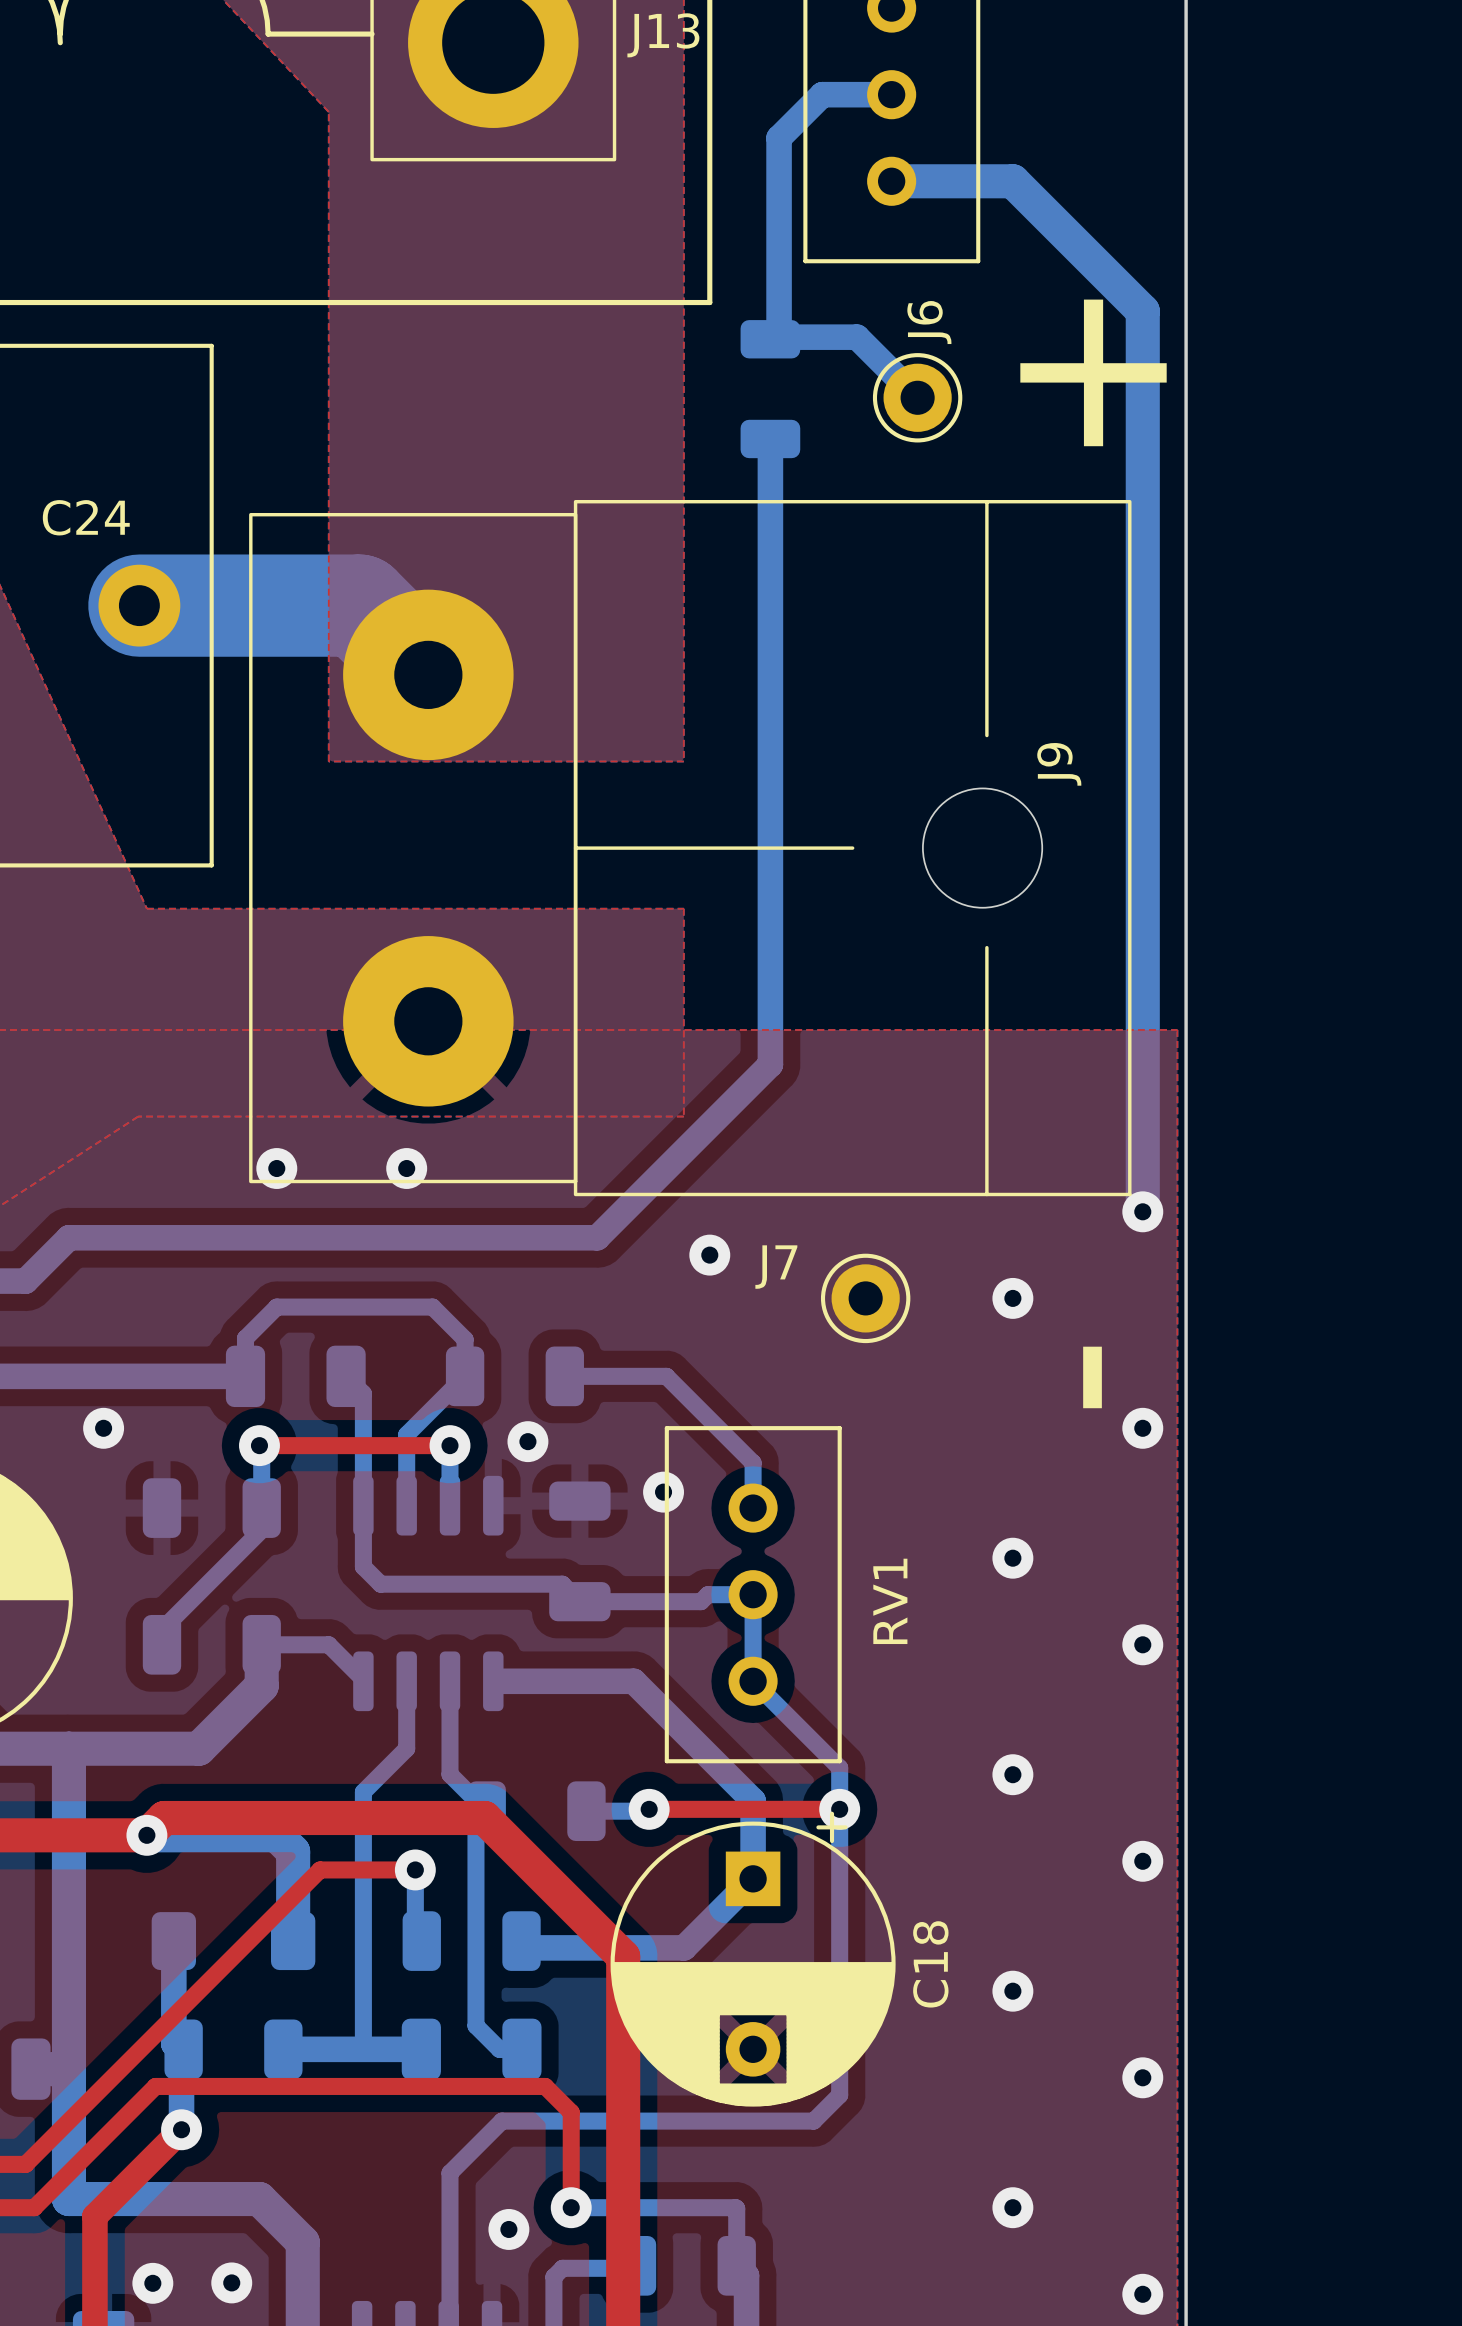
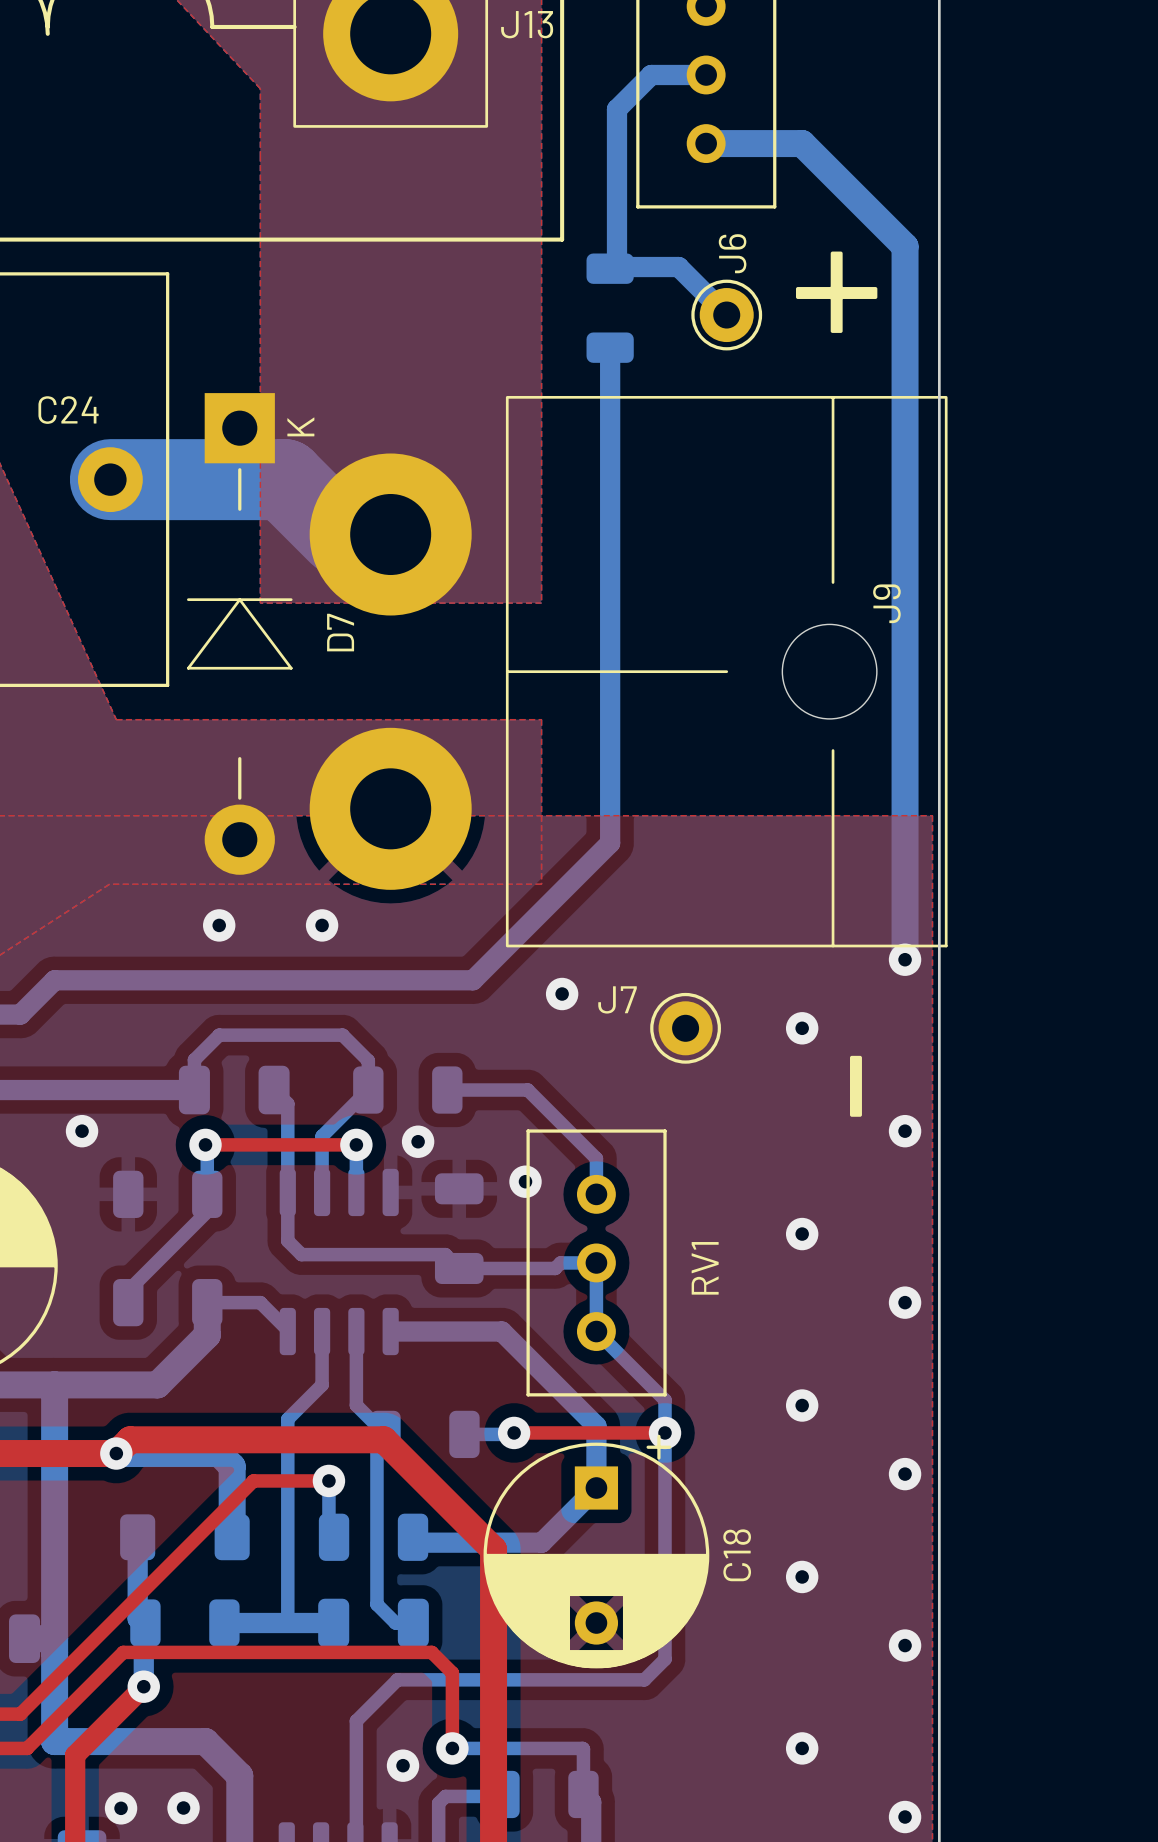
J9 footprint: [249, 499, 1132, 1197] -> [309, 395, 948, 948]
D7: none -> (239, 633)

